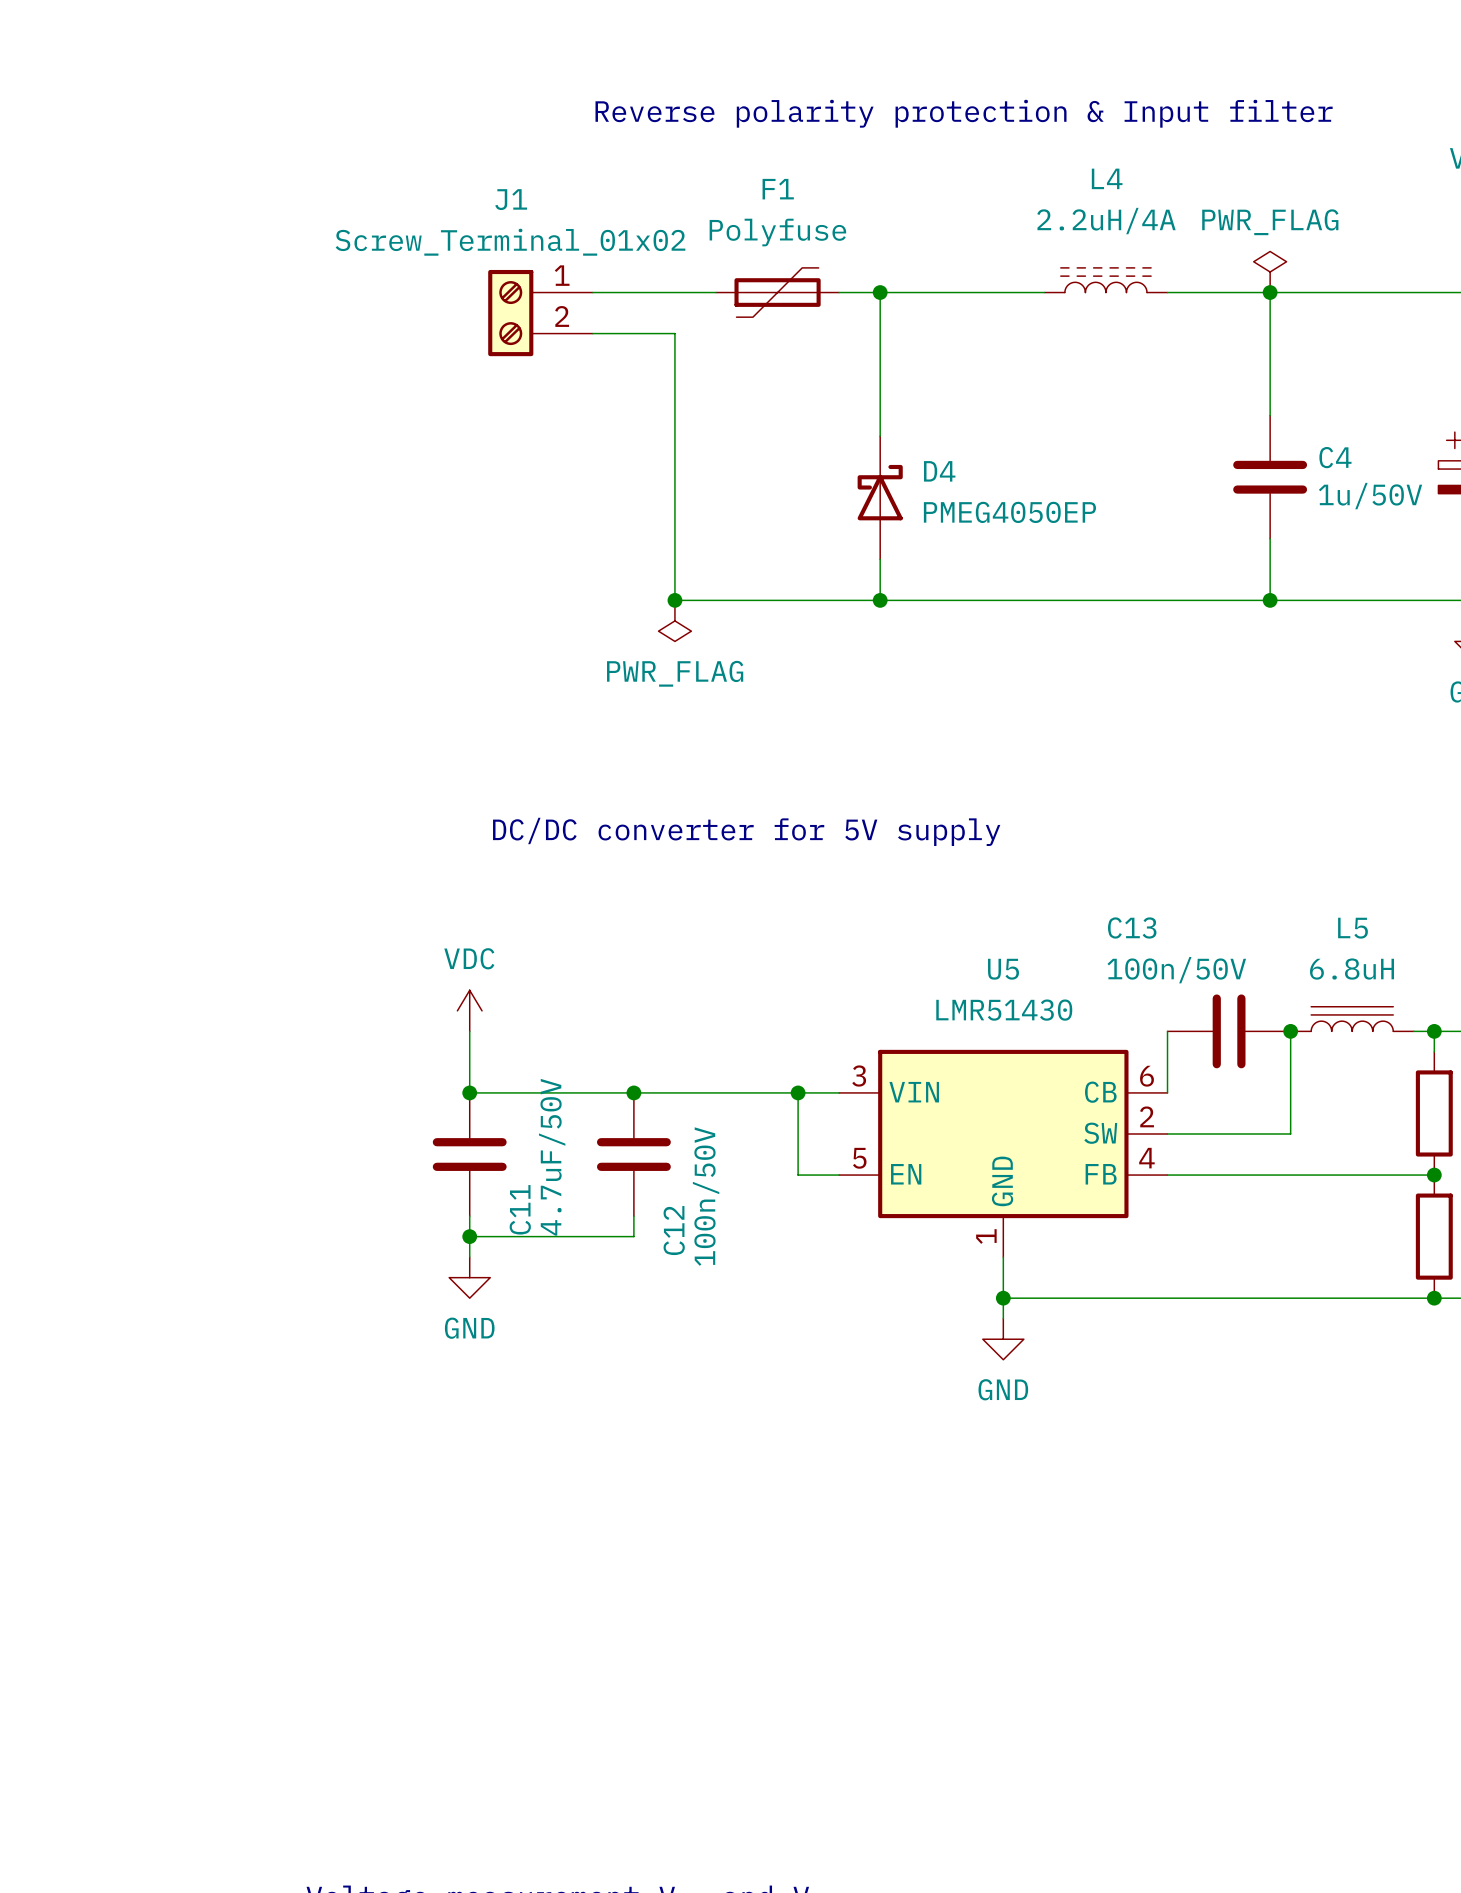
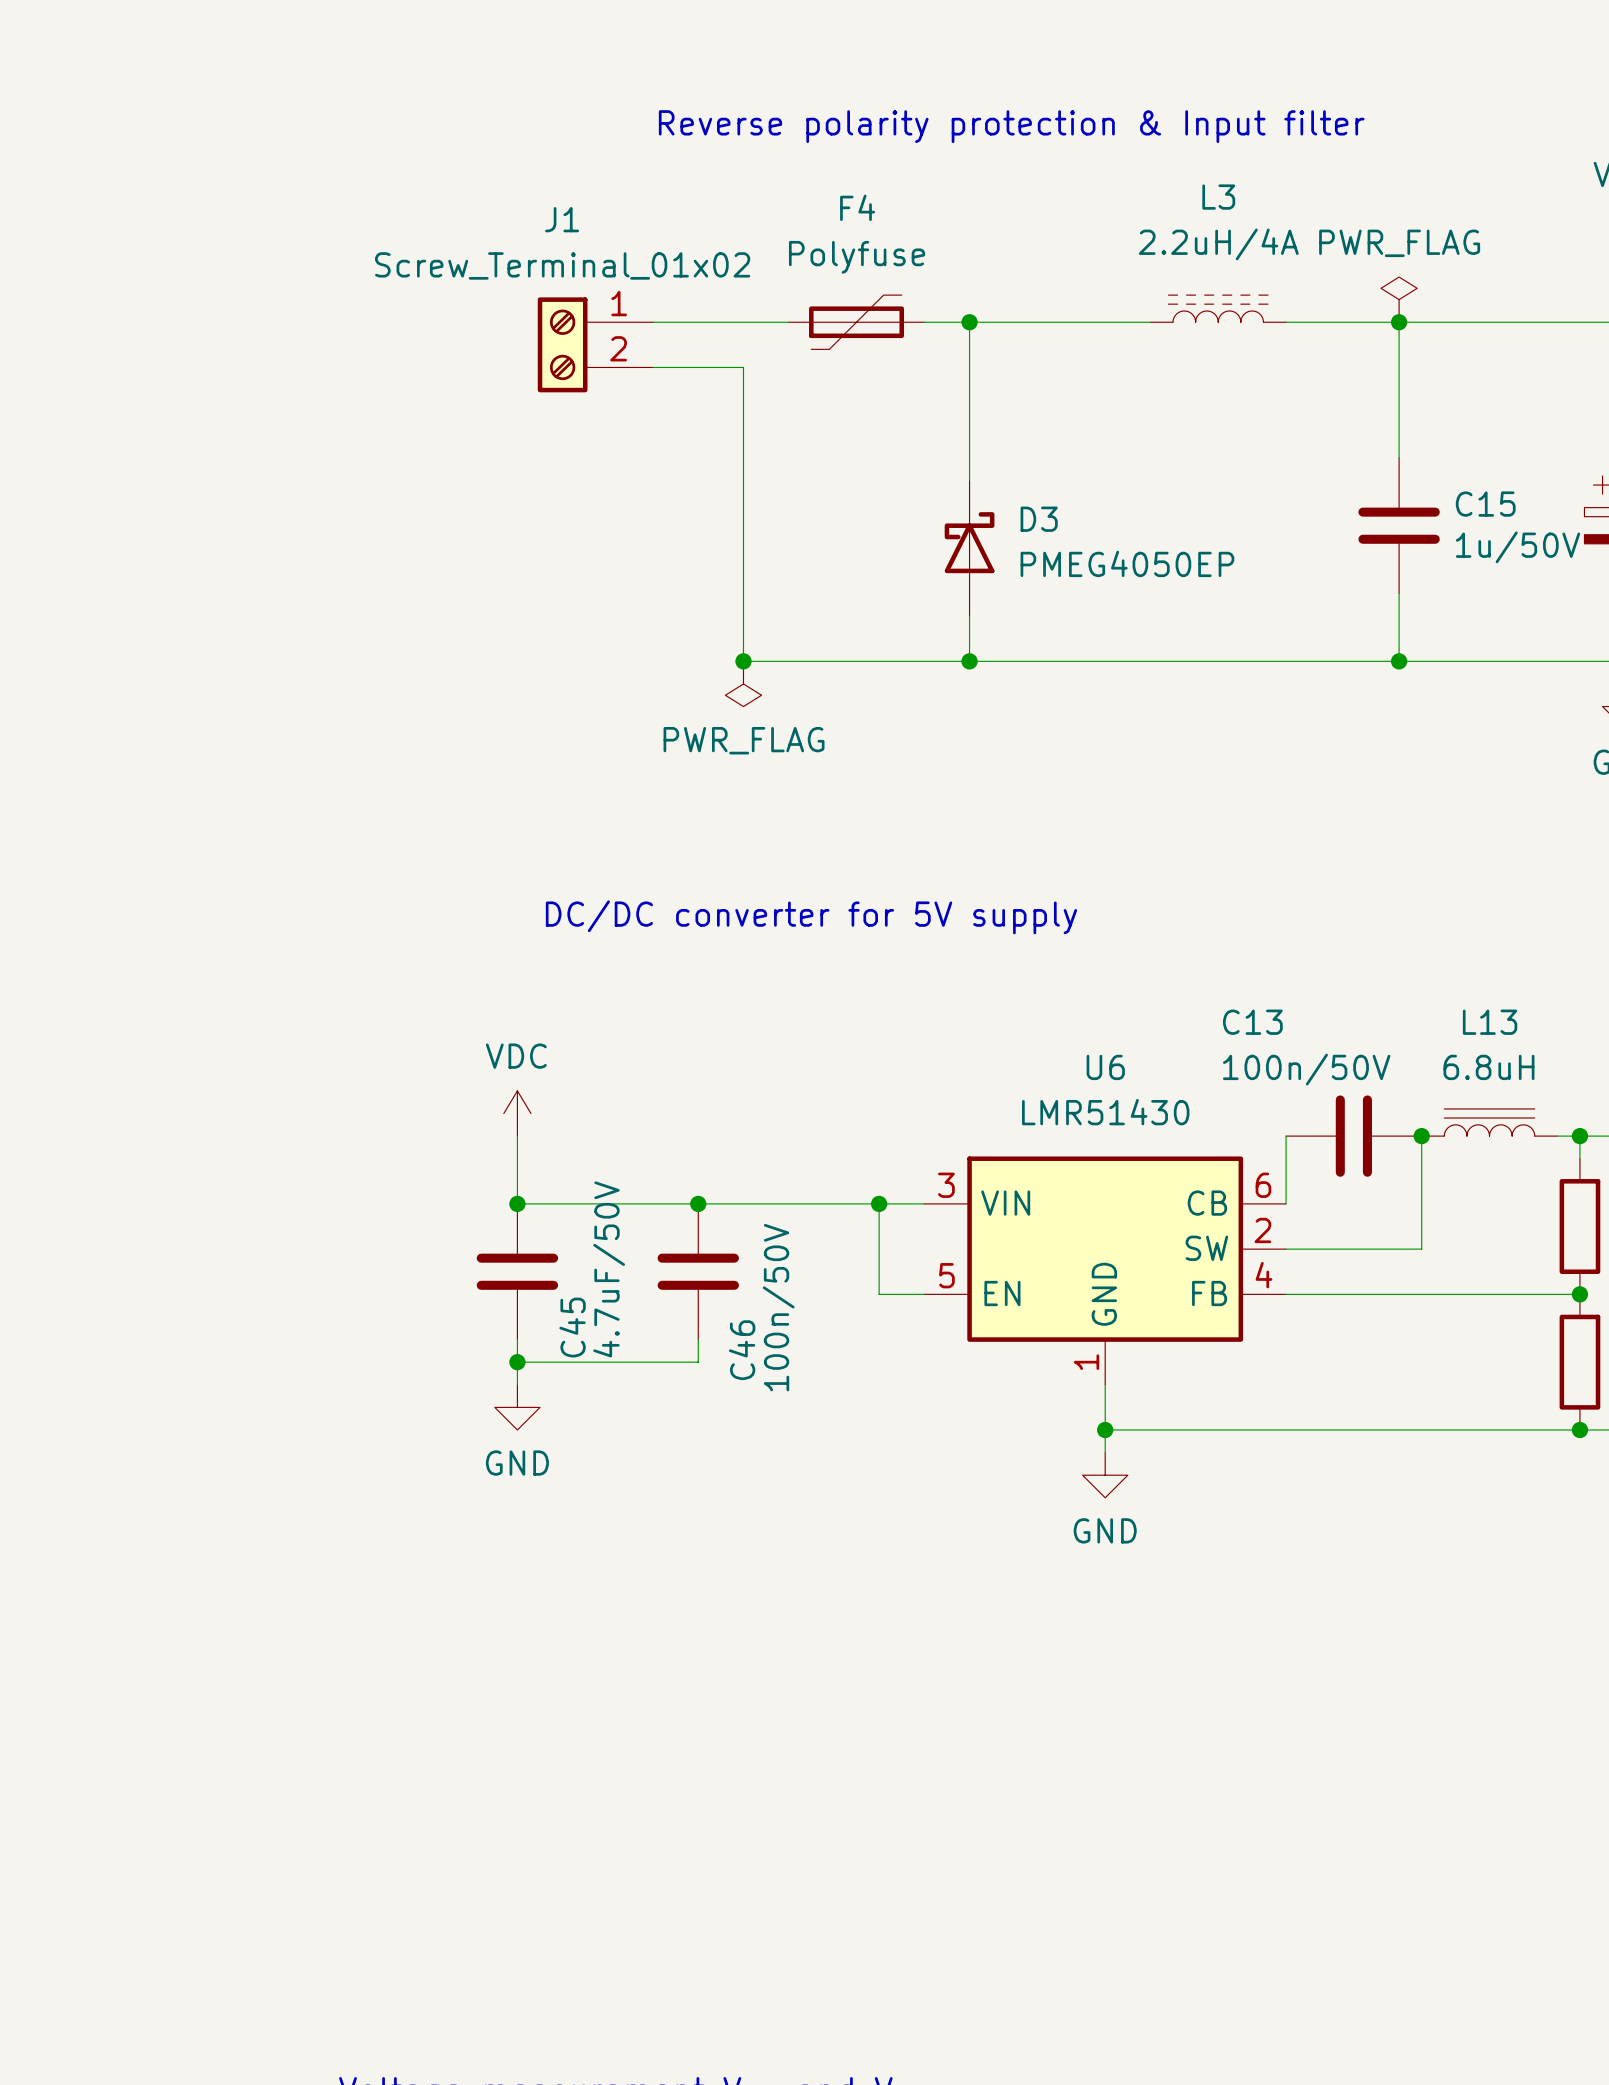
L4 name: L4 (1107, 178) -> L3 (1218, 197)
F1 name: F1 (778, 189) -> F4 (857, 207)
C4 name: C4 (1335, 457) -> C15 (1485, 504)
D4 name: D4 (939, 471) -> D3 (1039, 519)
L5 name: L5 (1353, 928) -> L13 (1490, 1022)
U5 name: U5 (1003, 969) -> U6 (1105, 1067)
C11 name: C11 (520, 1209) -> C45 (572, 1327)
C12 name: C12 (674, 1230) -> C46 (742, 1350)

